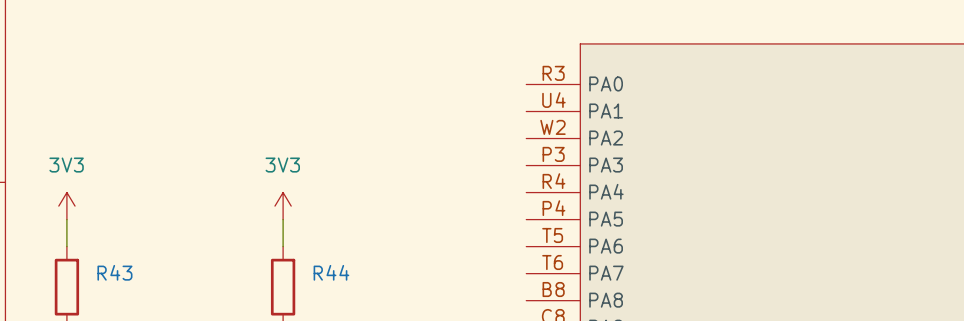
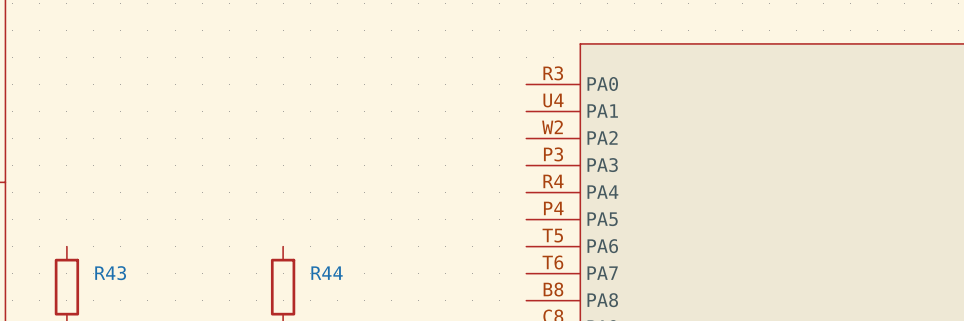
power symbol: 3V3 (66, 206) -> none
power symbol: 3V3 (283, 206) -> none
wire: (66, 219) (66, 246) -> none
wire: (283, 219) (283, 246) -> none

